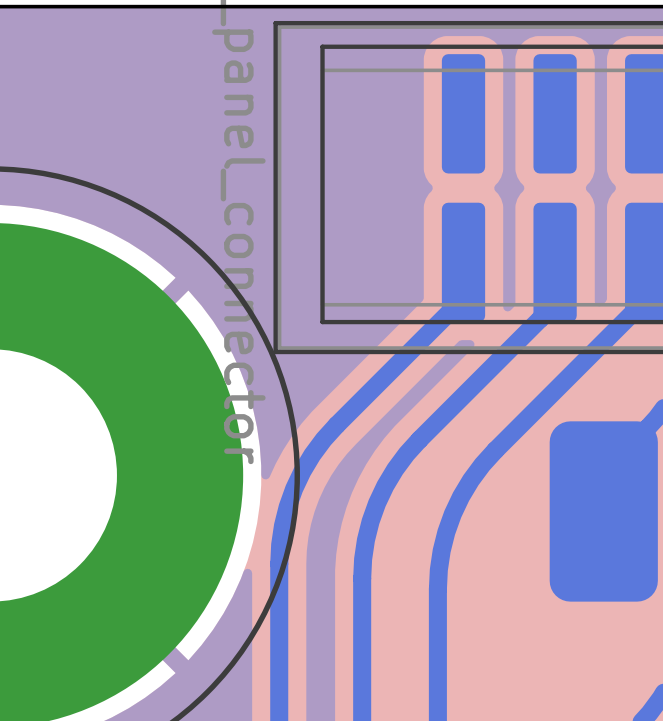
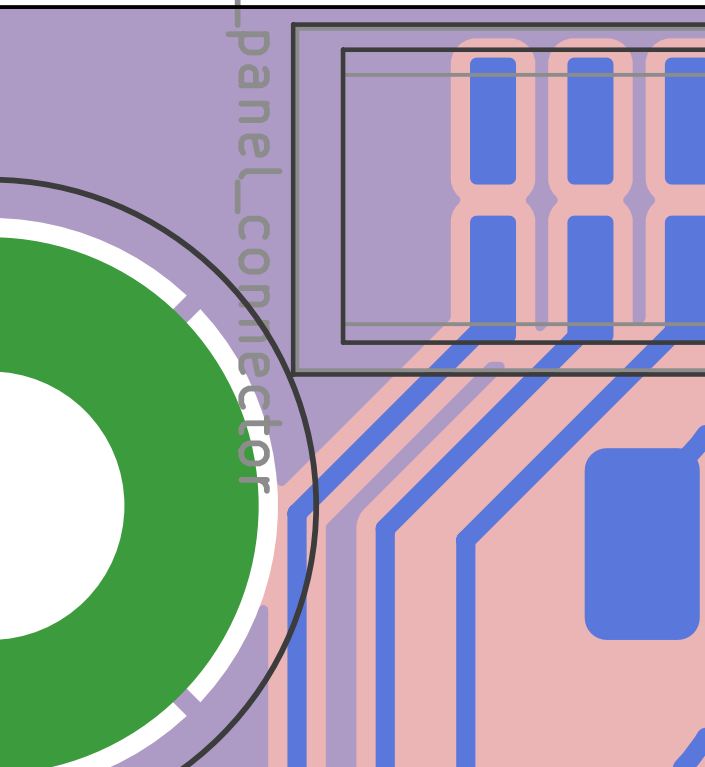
bottom track: (336, 425) (312, 454) (294, 488) (283, 525) (279, 563) -> (358, 452) (297, 513) (297, 599)
bottom track: (419, 439) (395, 469) (377, 503) (365, 540) (362, 578) -> (446, 467) (385, 528) (385, 615)
bottom track: (495, 450) (470, 480) (452, 514) (441, 550) (437, 589) -> (526, 479) (465, 540) (465, 626)

